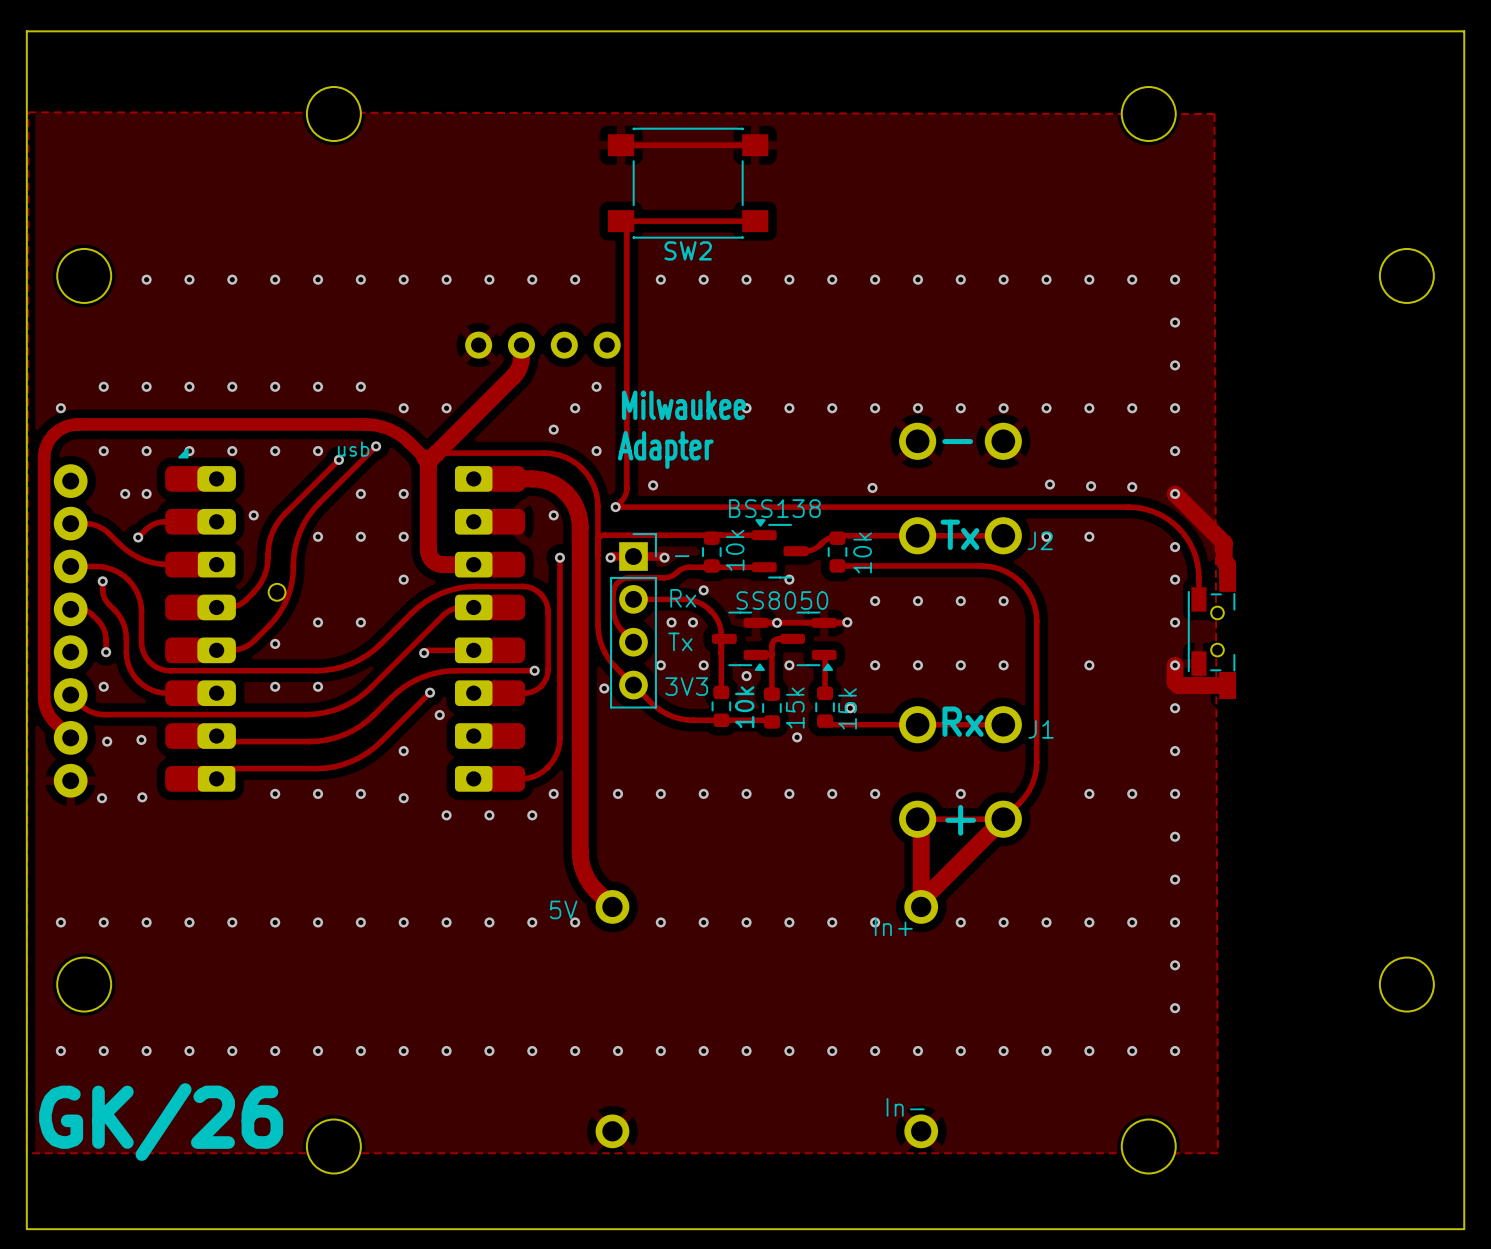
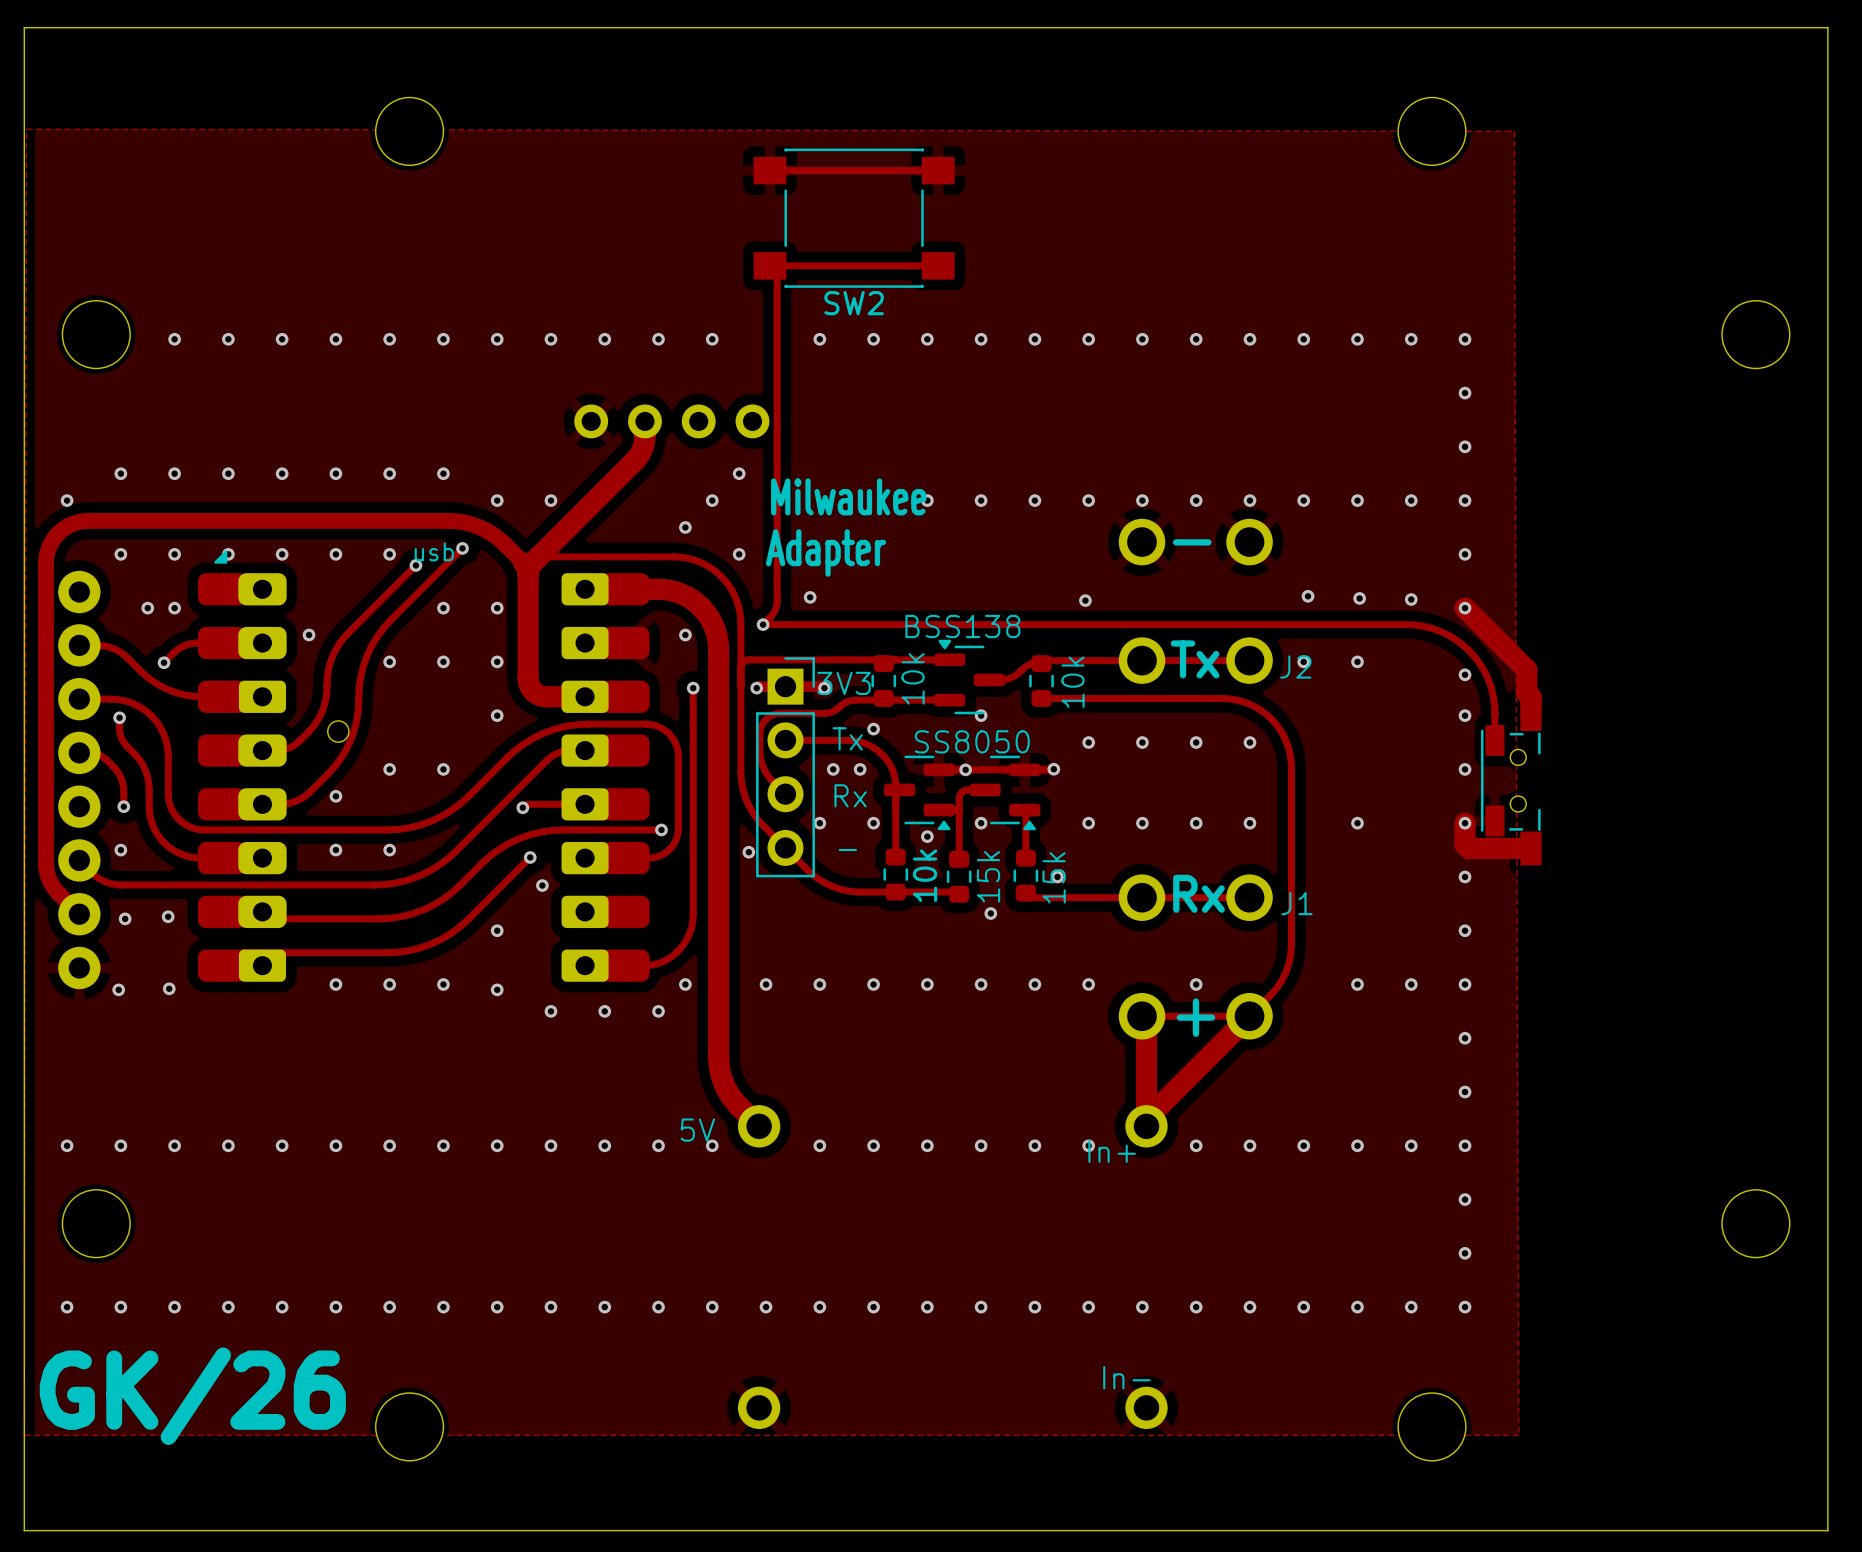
text position: - (682, 556) -> - (847, 849)
text position: Rx (683, 598) -> Rx (850, 795)
text position: Tx (680, 641) -> Tx (847, 738)
text position: 3V3 (686, 686) -> 3V3 (844, 683)

